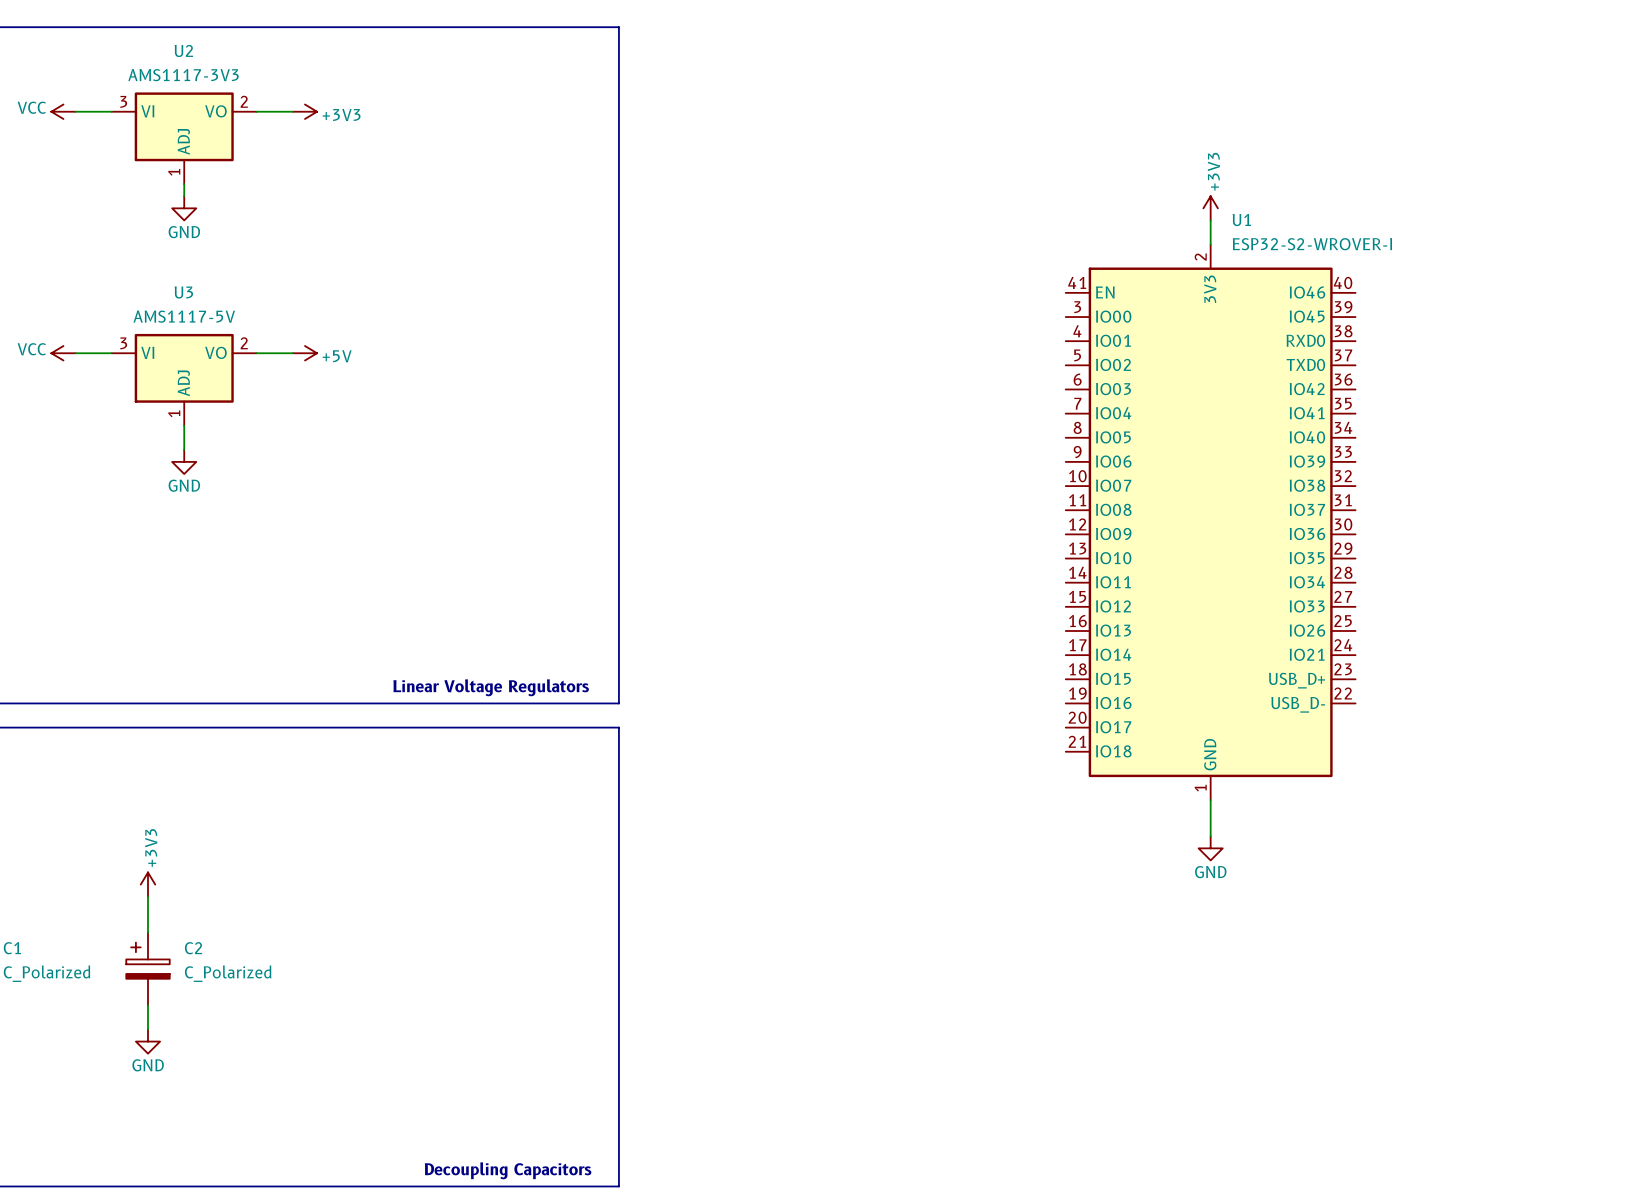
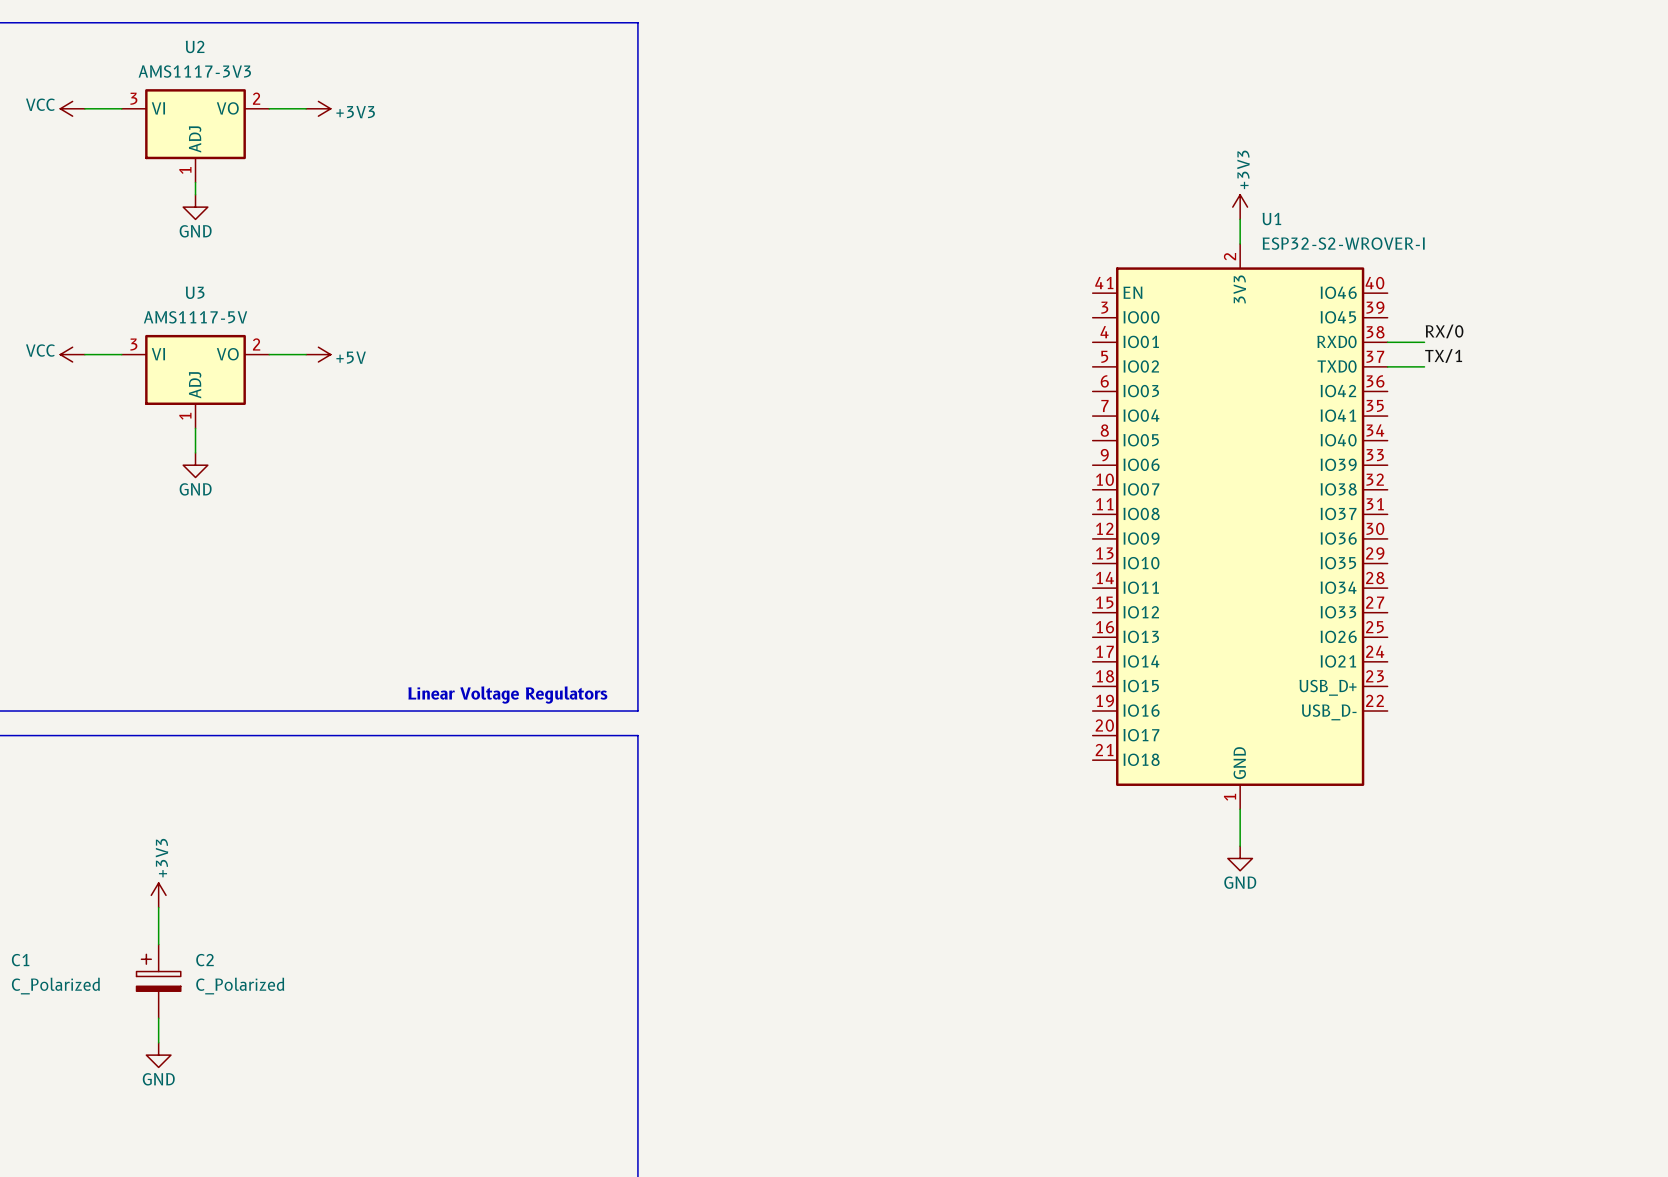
label: none -> RX/0 (1444, 331)
wire: none -> (1387, 342) (1424, 342)
label: none -> TX/1 (1443, 356)
wire: none -> (1387, 366) (1424, 366)

